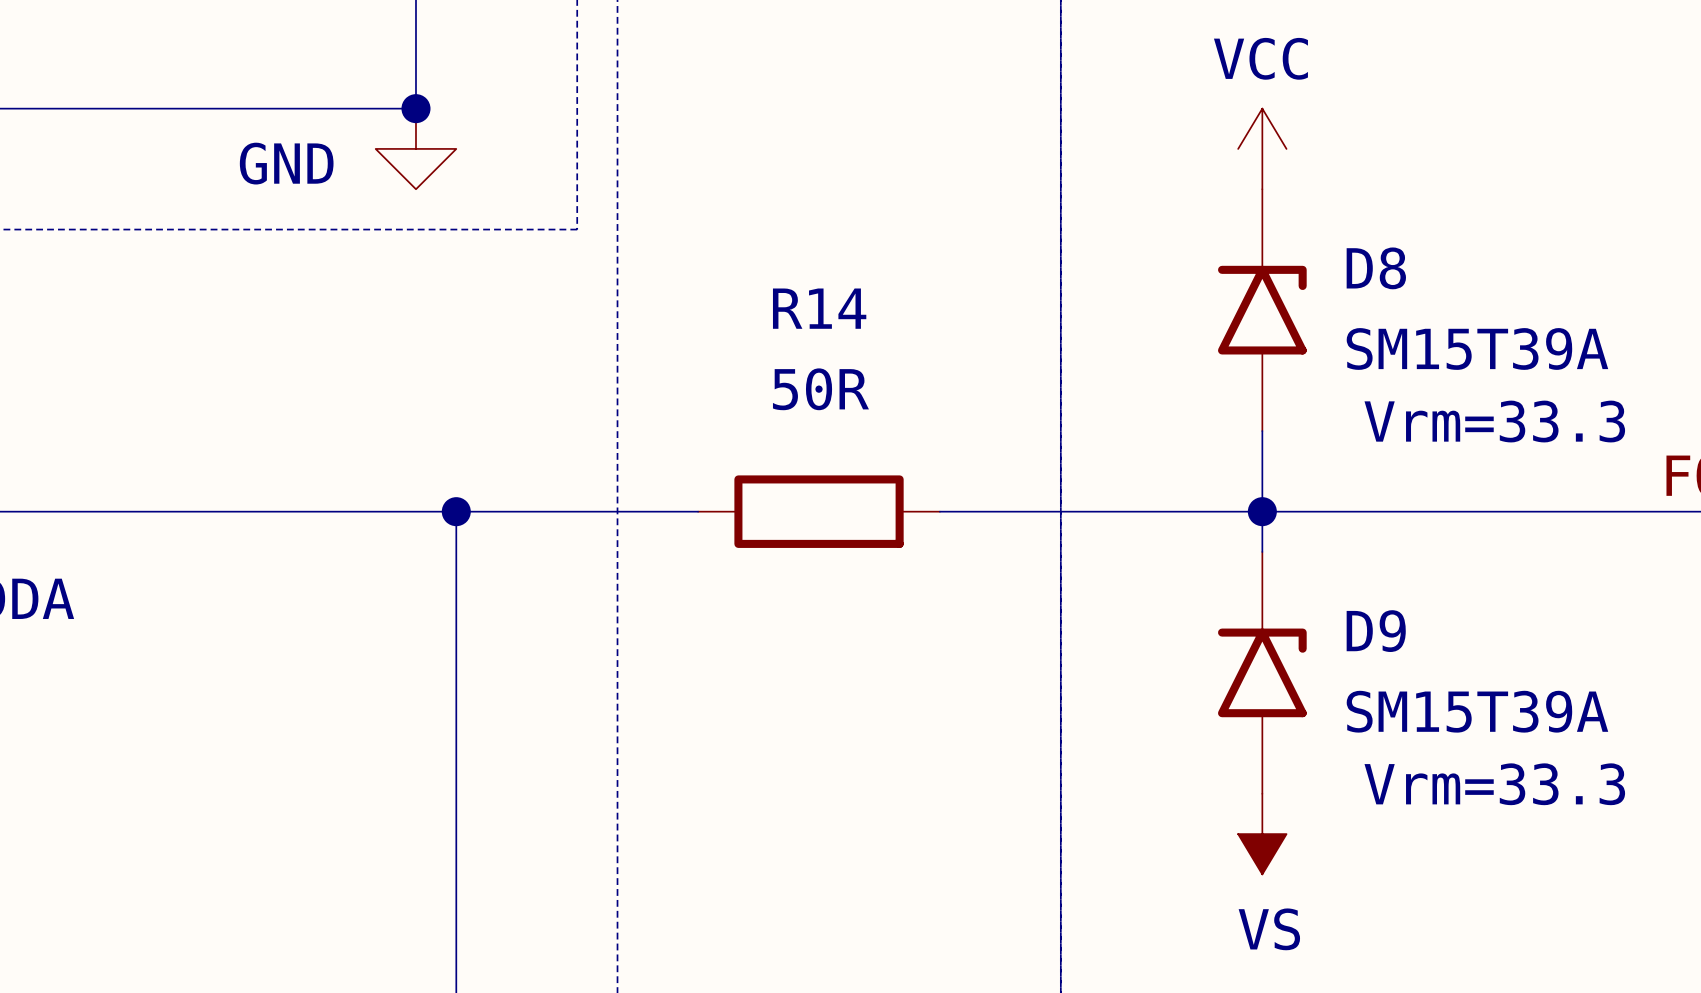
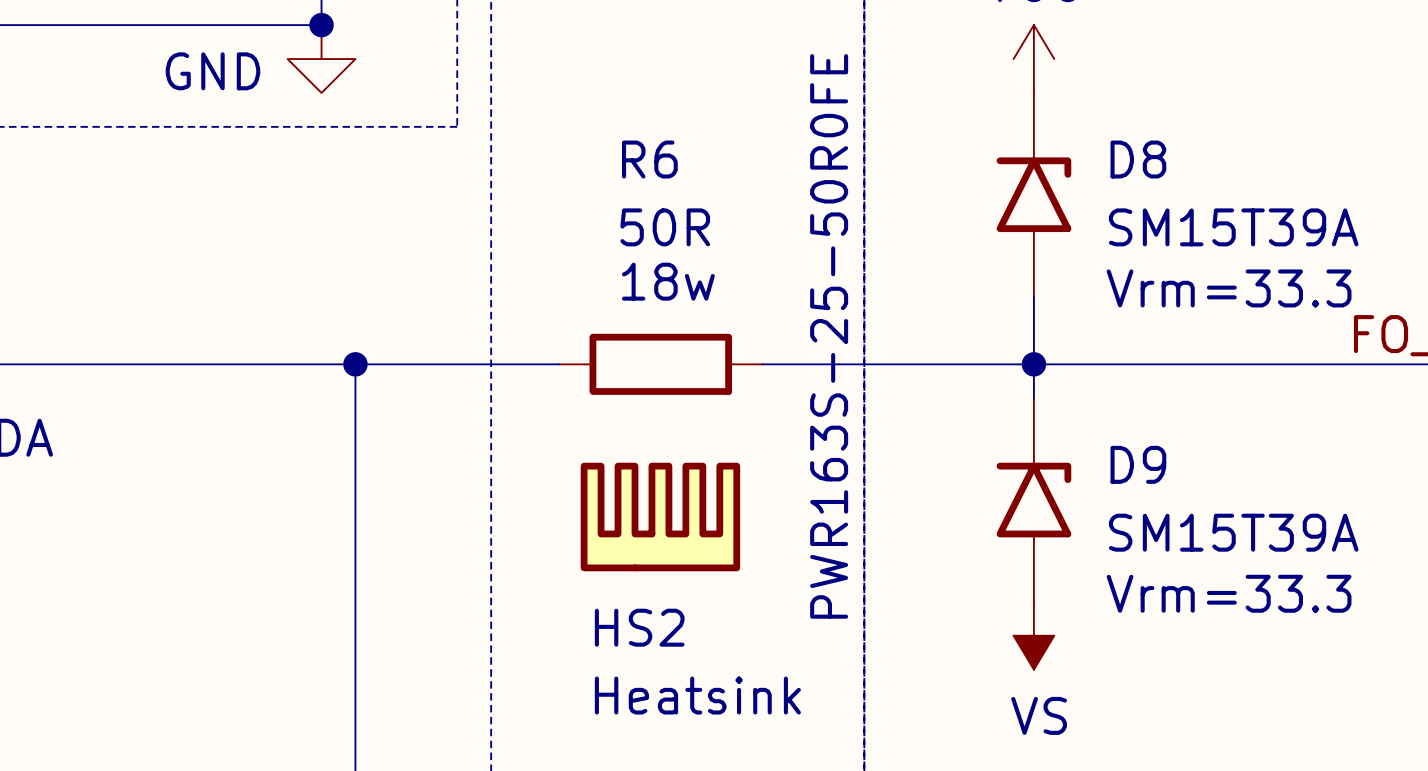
R14 name: R14 (819, 308) -> R6 (649, 159)
R14 value position: 50R (820, 389) -> 50R (665, 227)
R14 text: none -> 18w (668, 281)
R14 text: none -> PWR163S-25-50R0FE (829, 336)
HS2: none -> Heatsink (660, 517)

